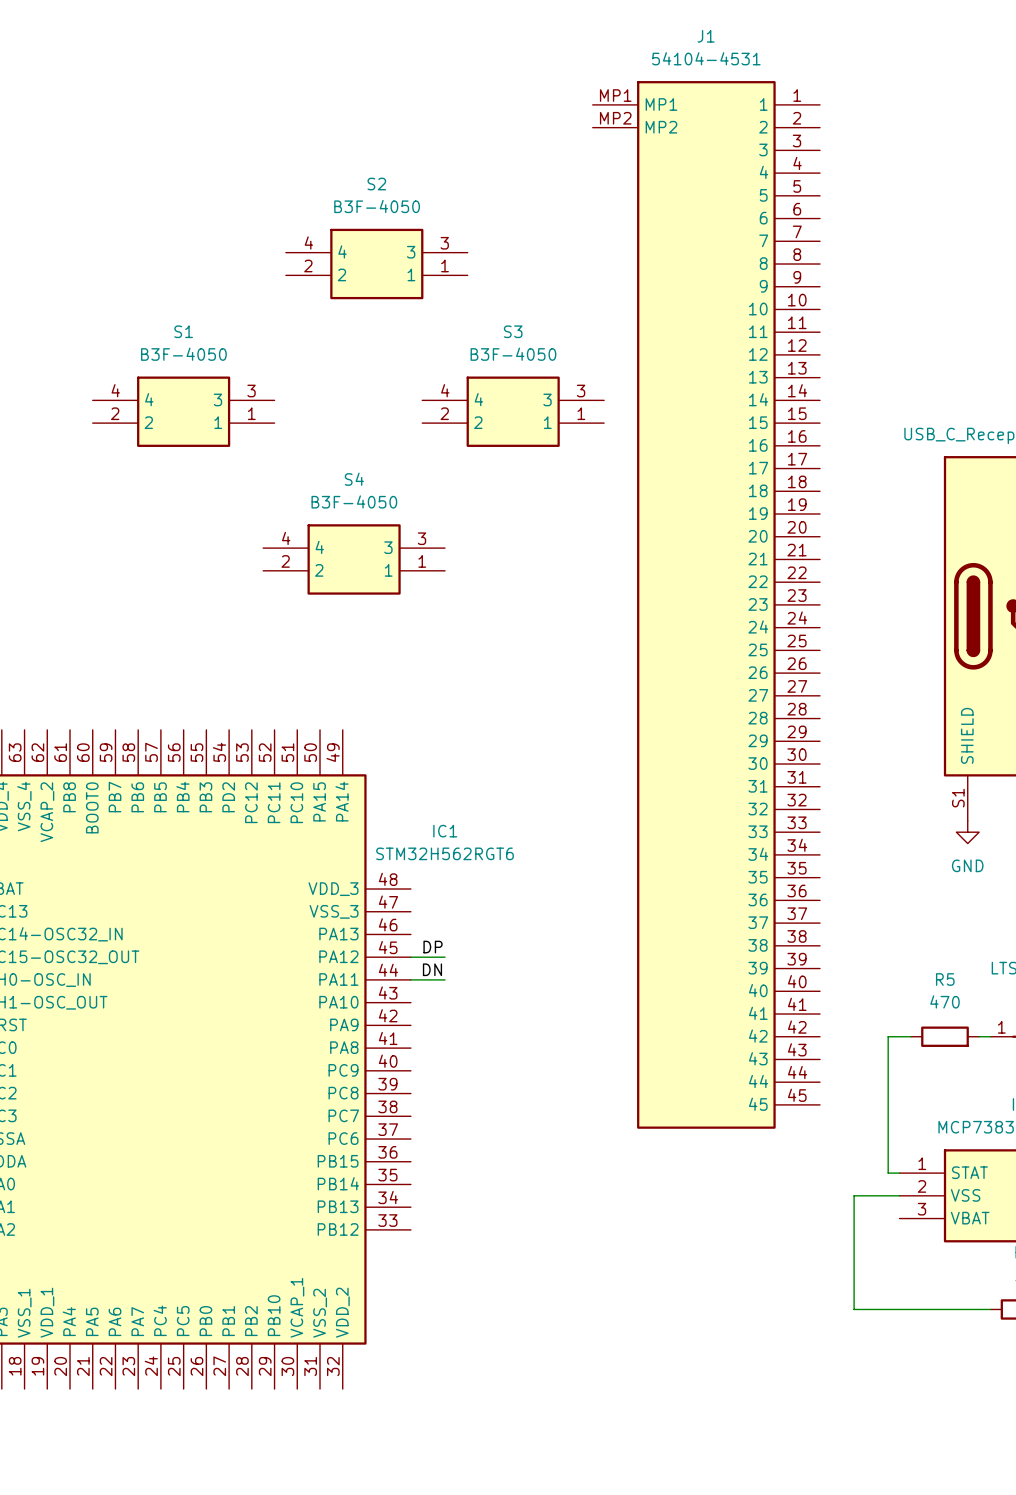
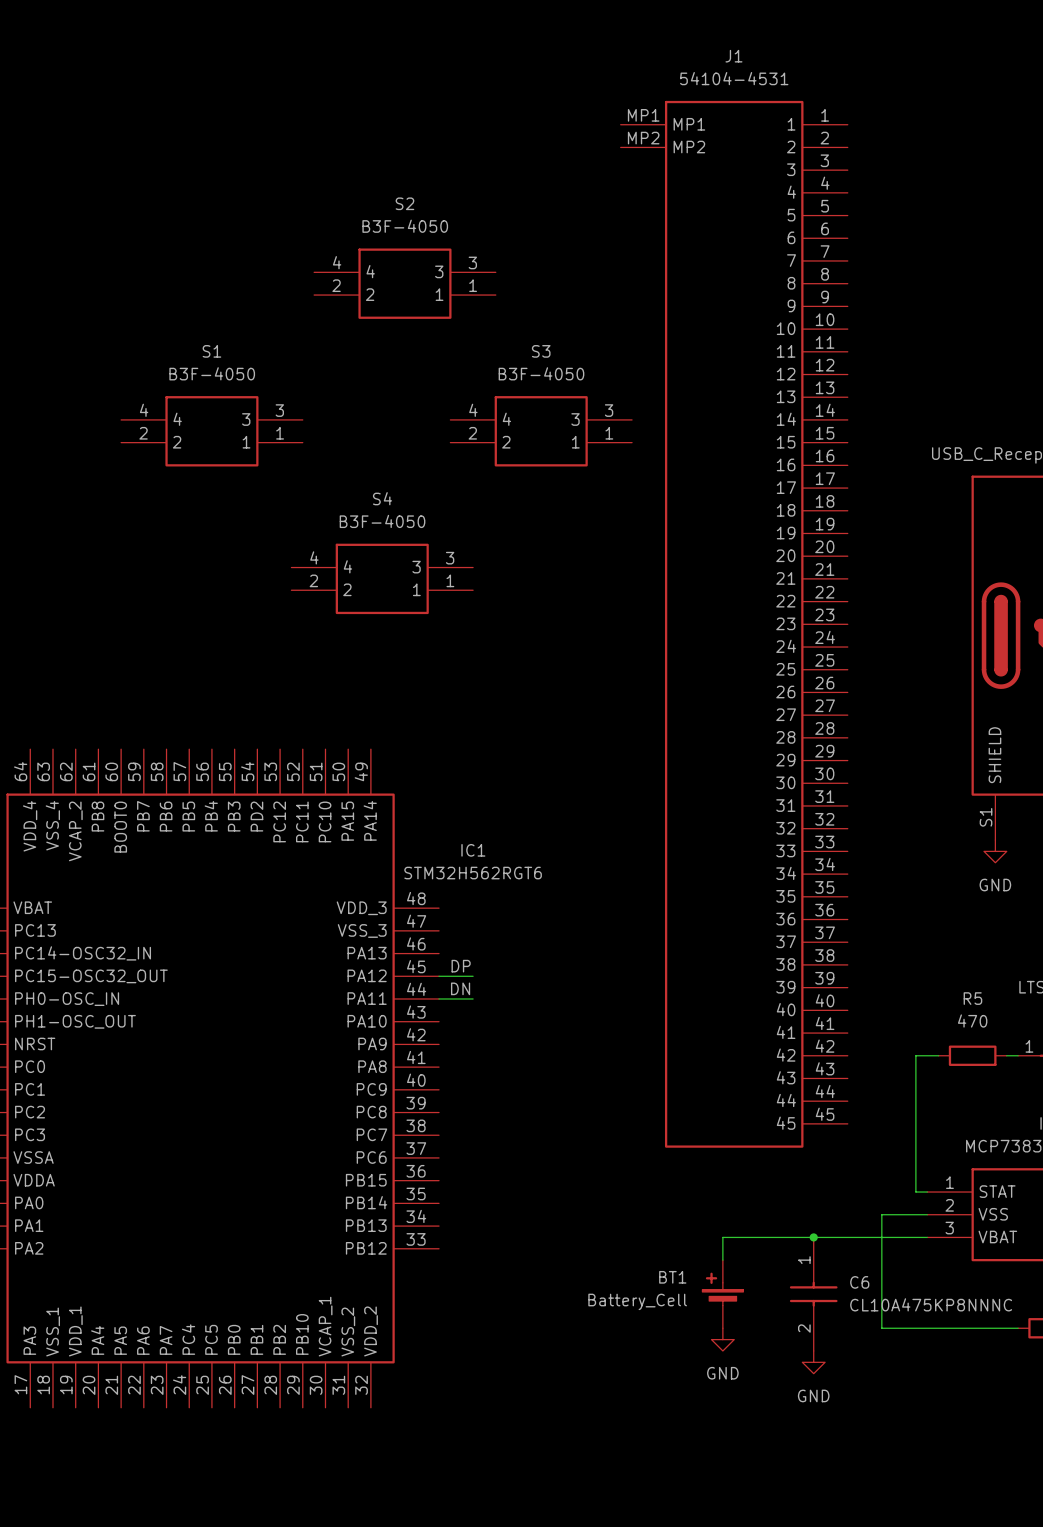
junction: none -> (813, 1237)
wire: none -> (927, 1237) (722, 1237) (722, 1260)
BT1: none -> Battery_Cell (722, 1294)
C6: none -> CL10A475KP8NNNC (813, 1294)
power symbol: none -> GND (722, 1339)
power symbol: none -> GND (813, 1362)

